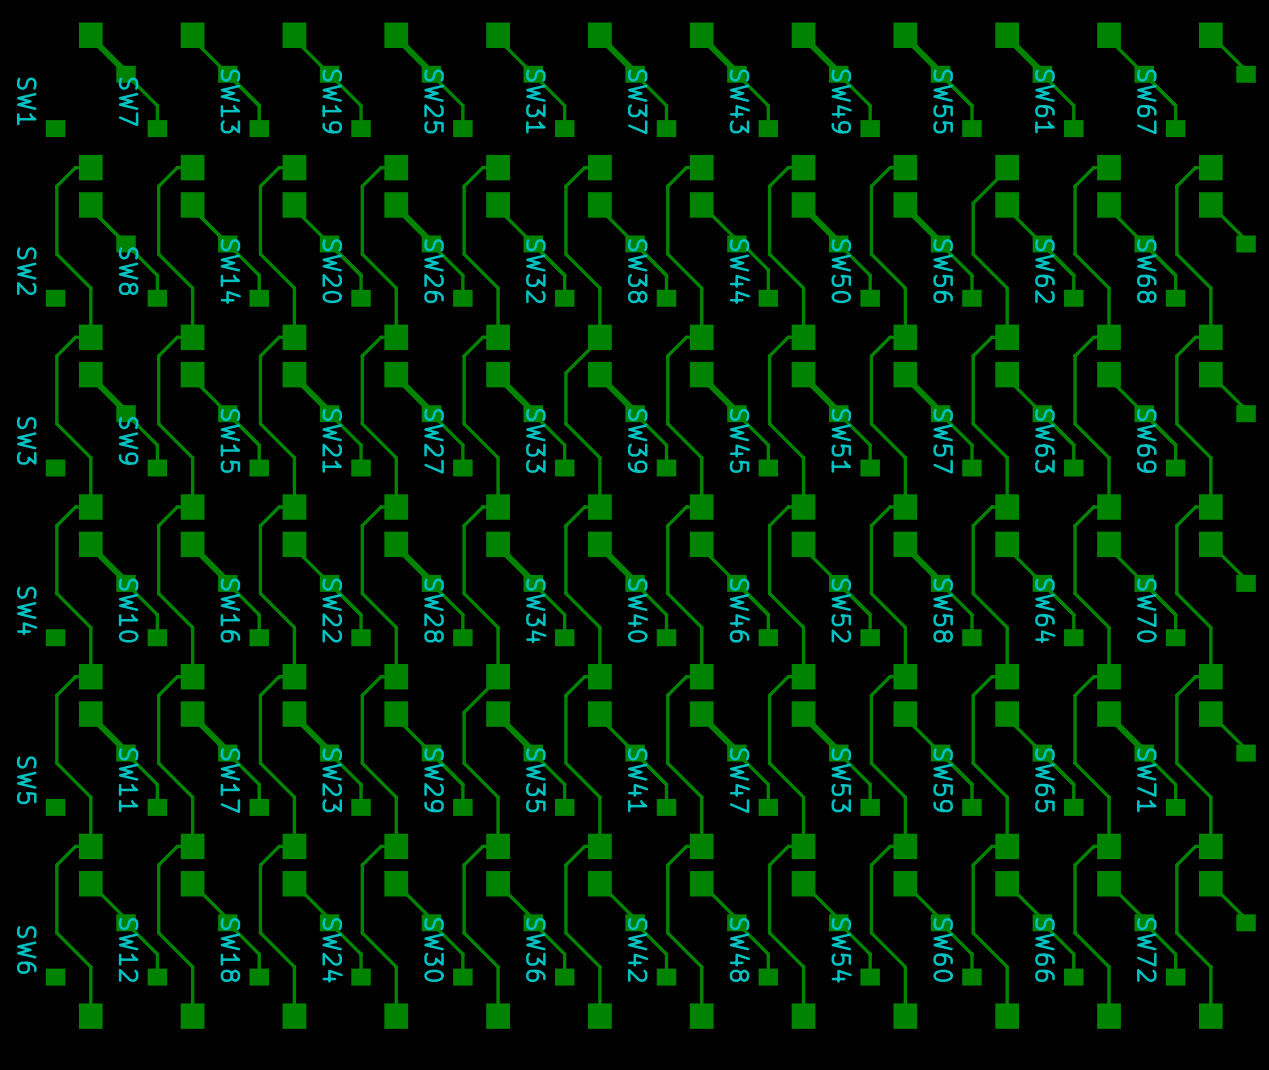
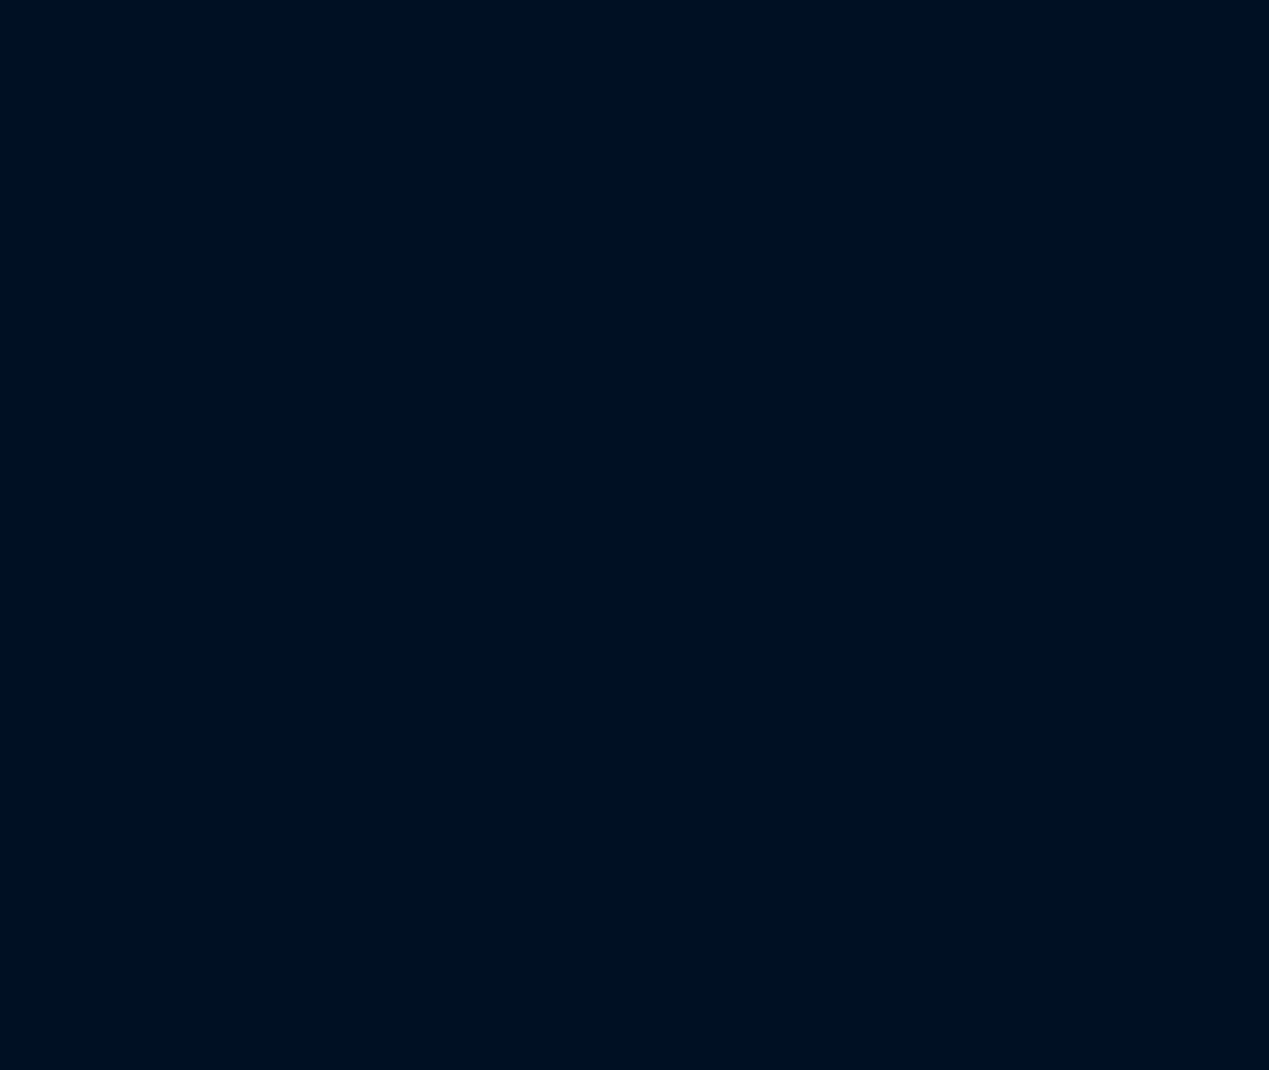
track: (192, 35) (192, 39) (259, 105) (259, 128) -> none
track: (294, 35) (294, 39) (361, 105) (361, 128) -> none
track: (498, 35) (498, 39) (564, 105) (564, 128) -> none
track: (1109, 35) (1109, 39) (1175, 105) (1175, 128) -> none
track: (1210, 35) (1246, 70) (1246, 74) -> none
track: (126, 74) (126, 70) (90, 35) (90, 39) (157, 105) (157, 128) -> none
track: (431, 74) (431, 70) (396, 35) (396, 39) (462, 105) (462, 128) -> none
track: (635, 74) (635, 70) (599, 35) (599, 39) (666, 105) (666, 128) -> none
track: (736, 74) (736, 70) (701, 35) (701, 39) (768, 105) (768, 128) -> none
track: (838, 74) (838, 70) (803, 35) (803, 39) (870, 105) (870, 128) -> none
track: (940, 74) (940, 70) (905, 35) (905, 39) (971, 105) (971, 128) -> none
track: (1042, 74) (1042, 70) (1007, 35) (1007, 39) (1073, 105) (1073, 128) -> none
SW1: (90, 101) -> none
SW7: (192, 101) -> none
SW13: (294, 101) -> none
SW19: (396, 101) -> none
SW25: (498, 101) -> none
SW31: (599, 101) -> none
SW37: (701, 101) -> none
SW43: (803, 101) -> none
SW49: (905, 101) -> none
SW55: (1007, 101) -> none
SW61: (1109, 101) -> none
SW67: (1210, 101) -> none
track: (90, 167) (75, 167) (56, 186) (56, 254) (90, 288) (90, 337) (75, 337) (56, 355) (56, 423) (90, 457) (90, 507) (75, 507) (56, 525) (56, 593) (90, 627) (90, 676) (75, 676) (56, 695) (56, 763) (90, 797) (90, 846) (75, 846) (56, 865) (56, 932) (90, 966) (90, 1016) -> none
track: (192, 167) (177, 167) (158, 186) (158, 254) (192, 288) (192, 337) (177, 337) (158, 355) (158, 423) (192, 457) (192, 507) (177, 507) (158, 525) (158, 593) (192, 627) (192, 676) (177, 676) (158, 695) (158, 763) (192, 797) (192, 846) (177, 846) (158, 865) (158, 932) (192, 966) (192, 1016) -> none
track: (294, 167) (279, 167) (260, 186) (260, 254) (294, 288) (294, 337) (279, 337) (260, 355) (260, 423) (294, 457) (294, 507) (279, 507) (260, 525) (260, 593) (294, 627) (294, 676) (279, 676) (260, 695) (260, 763) (294, 797) (294, 846) (279, 846) (260, 865) (260, 932) (294, 966) (294, 1016) -> none
track: (396, 167) (380, 167) (362, 186) (362, 254) (396, 288) (396, 337) (380, 337) (362, 355) (362, 423) (396, 457) (396, 507) (380, 507) (362, 525) (362, 593) (396, 627) (396, 676) (380, 676) (362, 695) (362, 763) (396, 797) (396, 846) (380, 846) (362, 865) (362, 932) (396, 966) (396, 1016) -> none
track: (498, 167) (482, 167) (464, 186) (464, 254) (498, 288) (498, 337) (482, 337) (464, 355) (464, 423) (498, 457) (498, 507) (482, 507) (464, 525) (464, 593) (498, 627) (498, 678) (464, 712) (464, 763) (498, 797) (498, 846) (482, 846) (464, 865) (464, 932) (498, 966) (498, 1016) -> none
track: (599, 167) (584, 167) (565, 186) (565, 254) (599, 288) (599, 339) (565, 372) (565, 423) (599, 457) (599, 507) (584, 507) (565, 525) (565, 593) (599, 627) (599, 676) (584, 676) (565, 695) (565, 763) (599, 797) (599, 846) (584, 846) (565, 865) (565, 932) (599, 966) (599, 1016) -> none
track: (701, 167) (686, 167) (667, 186) (667, 254) (701, 288) (701, 337) (686, 337) (667, 355) (667, 423) (701, 457) (701, 507) (686, 507) (667, 525) (667, 593) (701, 627) (701, 676) (686, 676) (667, 695) (667, 763) (701, 797) (701, 846) (686, 846) (667, 865) (667, 932) (701, 966) (701, 1016) -> none
track: (803, 167) (788, 167) (769, 186) (769, 254) (803, 288) (803, 337) (788, 337) (769, 355) (769, 423) (803, 457) (803, 507) (788, 507) (769, 525) (769, 593) (803, 627) (803, 676) (788, 676) (769, 695) (769, 763) (803, 797) (803, 846) (788, 846) (769, 865) (769, 932) (803, 966) (803, 1016) -> none
track: (905, 167) (890, 167) (871, 186) (871, 254) (905, 288) (905, 337) (890, 337) (871, 355) (871, 423) (905, 457) (905, 507) (890, 507) (871, 525) (871, 593) (905, 627) (905, 676) (890, 676) (871, 695) (871, 763) (905, 797) (905, 846) (890, 846) (871, 865) (871, 932) (905, 966) (905, 1016) -> none
track: (1007, 167) (973, 203) (973, 254) (1007, 288) (1007, 337) (991, 337) (973, 355) (973, 423) (1007, 457) (1007, 507) (991, 507) (973, 525) (973, 593) (1007, 627) (1007, 676) (991, 676) (973, 695) (973, 763) (1007, 797) (1007, 846) (991, 846) (973, 865) (973, 932) (1007, 966) (1007, 1016) -> none
track: (1109, 167) (1093, 167) (1075, 186) (1075, 254) (1109, 288) (1109, 337) (1093, 337) (1075, 355) (1075, 423) (1109, 457) (1109, 507) (1093, 507) (1075, 525) (1075, 593) (1109, 627) (1109, 676) (1093, 676) (1075, 695) (1075, 763) (1109, 797) (1109, 846) (1093, 846) (1075, 865) (1075, 932) (1109, 966) (1109, 1016) -> none
track: (1210, 167) (1195, 167) (1176, 186) (1176, 254) (1210, 288) (1210, 337) (1195, 337) (1176, 355) (1176, 423) (1210, 457) (1210, 507) (1195, 507) (1176, 525) (1176, 593) (1210, 627) (1210, 676) (1195, 676) (1176, 695) (1176, 763) (1210, 797) (1210, 846) (1195, 846) (1176, 865) (1176, 932) (1210, 966) (1210, 1016) -> none
track: (90, 204) (90, 208) (157, 275) (157, 298) -> none
track: (192, 204) (192, 208) (259, 275) (259, 298) -> none
track: (294, 204) (294, 208) (361, 275) (361, 298) -> none
track: (498, 204) (498, 208) (564, 275) (564, 298) -> none
track: (599, 204) (599, 208) (666, 275) (666, 298) -> none
track: (701, 204) (768, 269) (768, 298) -> none
track: (1007, 204) (1007, 208) (1073, 275) (1073, 298) -> none
track: (1109, 204) (1109, 208) (1175, 275) (1175, 298) -> none
track: (1210, 204) (1246, 240) (1246, 243) -> none
track: (431, 243) (431, 240) (396, 204) (396, 208) (462, 275) (462, 298) -> none
track: (838, 243) (838, 240) (803, 204) (803, 208) (870, 275) (870, 298) -> none
track: (940, 243) (940, 240) (905, 204) (905, 208) (971, 275) (971, 298) -> none
SW2: (90, 271) -> none
SW8: (192, 271) -> none
SW14: (294, 271) -> none
SW20: (396, 271) -> none
SW26: (498, 271) -> none
SW32: (599, 271) -> none
SW38: (701, 271) -> none
SW44: (803, 271) -> none
SW50: (905, 271) -> none
SW56: (1007, 271) -> none
SW62: (1109, 271) -> none
SW68: (1210, 271) -> none
track: (192, 374) (192, 378) (259, 445) (259, 467) -> none
track: (1007, 374) (1007, 378) (1073, 445) (1073, 467) -> none
track: (1109, 374) (1109, 378) (1175, 445) (1175, 467) -> none
track: (1210, 374) (1246, 409) (1246, 413) -> none
track: (126, 413) (126, 409) (90, 374) (90, 378) (157, 445) (157, 467) -> none
track: (329, 413) (329, 409) (294, 374) (294, 378) (361, 445) (361, 467) -> none
track: (431, 413) (431, 409) (396, 374) (396, 378) (462, 445) (462, 467) -> none
track: (533, 413) (533, 409) (498, 374) (498, 378) (564, 445) (564, 467) -> none
track: (635, 413) (635, 409) (599, 374) (599, 378) (666, 445) (666, 467) -> none
track: (736, 413) (736, 409) (701, 374) (701, 378) (768, 445) (768, 467) -> none
track: (838, 413) (838, 409) (803, 374) (803, 378) (870, 445) (870, 467) -> none
track: (940, 413) (940, 409) (905, 374) (905, 378) (971, 445) (971, 467) -> none
SW3: (90, 440) -> none
SW9: (192, 440) -> none
SW15: (294, 440) -> none
SW21: (396, 440) -> none
SW27: (498, 440) -> none
SW33: (599, 440) -> none
SW39: (701, 440) -> none
SW45: (803, 440) -> none
SW51: (905, 440) -> none
SW57: (1007, 440) -> none
SW63: (1109, 440) -> none
SW69: (1210, 440) -> none
track: (294, 544) (294, 548) (361, 614) (361, 637) -> none
track: (701, 544) (701, 548) (768, 614) (768, 637) -> none
track: (803, 544) (803, 548) (870, 614) (870, 637) -> none
track: (1007, 544) (1007, 548) (1073, 614) (1073, 637) -> none
track: (1109, 544) (1109, 548) (1175, 614) (1175, 637) -> none
track: (1210, 544) (1246, 579) (1246, 583) -> none
track: (126, 583) (126, 579) (90, 544) (90, 548) (157, 614) (157, 637) -> none
track: (227, 583) (227, 579) (192, 544) (192, 548) (259, 614) (259, 637) -> none
track: (431, 583) (431, 579) (396, 544) (396, 548) (462, 614) (462, 637) -> none
track: (533, 583) (533, 579) (498, 544) (498, 548) (564, 614) (564, 637) -> none
track: (635, 583) (635, 579) (599, 544) (599, 548) (666, 614) (666, 637) -> none
track: (940, 583) (940, 579) (905, 544) (905, 548) (971, 614) (971, 637) -> none
SW4: (90, 610) -> none
SW10: (192, 610) -> none
SW16: (294, 610) -> none
SW22: (396, 610) -> none
SW28: (498, 610) -> none
SW34: (599, 610) -> none
SW40: (701, 610) -> none
SW46: (803, 610) -> none
SW52: (905, 610) -> none
SW58: (1007, 610) -> none
SW64: (1109, 610) -> none
SW70: (1210, 610) -> none
track: (396, 714) (396, 717) (462, 784) (462, 807) -> none
track: (599, 714) (599, 717) (666, 784) (666, 807) -> none
track: (905, 714) (905, 717) (971, 784) (971, 807) -> none
track: (1007, 714) (1007, 717) (1073, 784) (1073, 807) -> none
track: (1210, 714) (1246, 749) (1246, 753) -> none
track: (126, 753) (126, 749) (90, 714) (90, 717) (157, 784) (157, 807) -> none
track: (227, 753) (227, 749) (192, 714) (192, 717) (259, 784) (259, 807) -> none
track: (329, 753) (329, 749) (294, 714) (294, 717) (361, 784) (361, 807) -> none
track: (533, 753) (533, 749) (498, 714) (498, 717) (564, 784) (564, 807) -> none
track: (736, 753) (736, 749) (701, 714) (701, 717) (768, 784) (768, 807) -> none
track: (838, 753) (838, 749) (803, 714) (803, 717) (870, 784) (870, 807) -> none
track: (1144, 753) (1144, 749) (1109, 714) (1109, 717) (1175, 784) (1175, 807) -> none
SW5: (90, 780) -> none
SW11: (192, 780) -> none
SW17: (294, 780) -> none
SW23: (396, 780) -> none
SW29: (498, 780) -> none
SW35: (599, 780) -> none
SW41: (701, 780) -> none
SW47: (803, 780) -> none
SW53: (905, 780) -> none
SW59: (1007, 780) -> none
SW65: (1109, 780) -> none
SW71: (1210, 780) -> none
track: (90, 883) (157, 954) (157, 977) -> none
track: (192, 883) (259, 954) (259, 977) -> none
track: (294, 883) (361, 954) (361, 977) -> none
track: (396, 883) (462, 954) (462, 977) -> none
track: (498, 883) (564, 954) (564, 977) -> none
track: (599, 883) (666, 954) (666, 977) -> none
track: (701, 883) (768, 954) (768, 977) -> none
track: (803, 883) (870, 954) (870, 977) -> none
track: (905, 883) (971, 954) (971, 977) -> none
track: (1007, 883) (1073, 954) (1073, 977) -> none
track: (1109, 883) (1175, 954) (1175, 977) -> none
track: (1210, 883) (1246, 918) (1246, 922) -> none
SW6: (90, 949) -> none
SW12: (192, 949) -> none
SW18: (294, 949) -> none
SW24: (396, 949) -> none
SW30: (498, 949) -> none
SW36: (599, 949) -> none
SW42: (701, 949) -> none
SW48: (803, 949) -> none
SW54: (905, 949) -> none
SW60: (1007, 949) -> none
SW66: (1109, 949) -> none
SW72: (1210, 949) -> none

